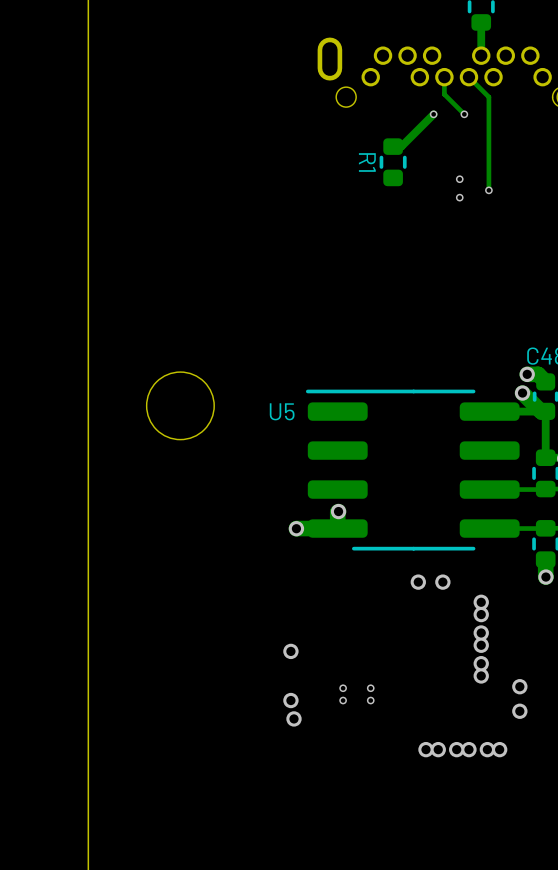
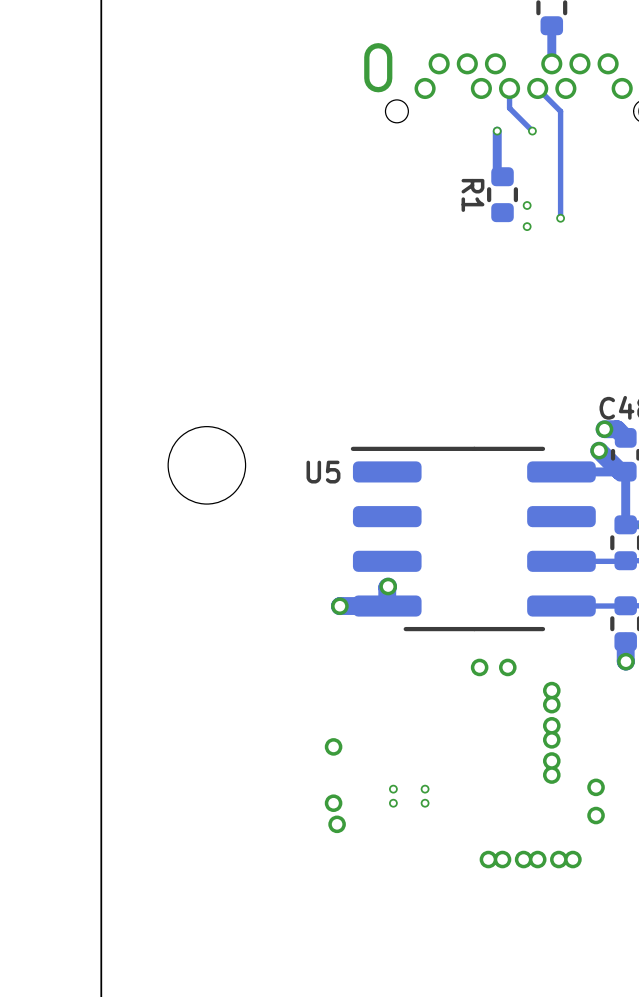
track: (433, 114) (401, 146) (393, 146) -> (497, 131) (497, 171) (502, 176)
R1 position: (393, 162) -> (502, 194)

